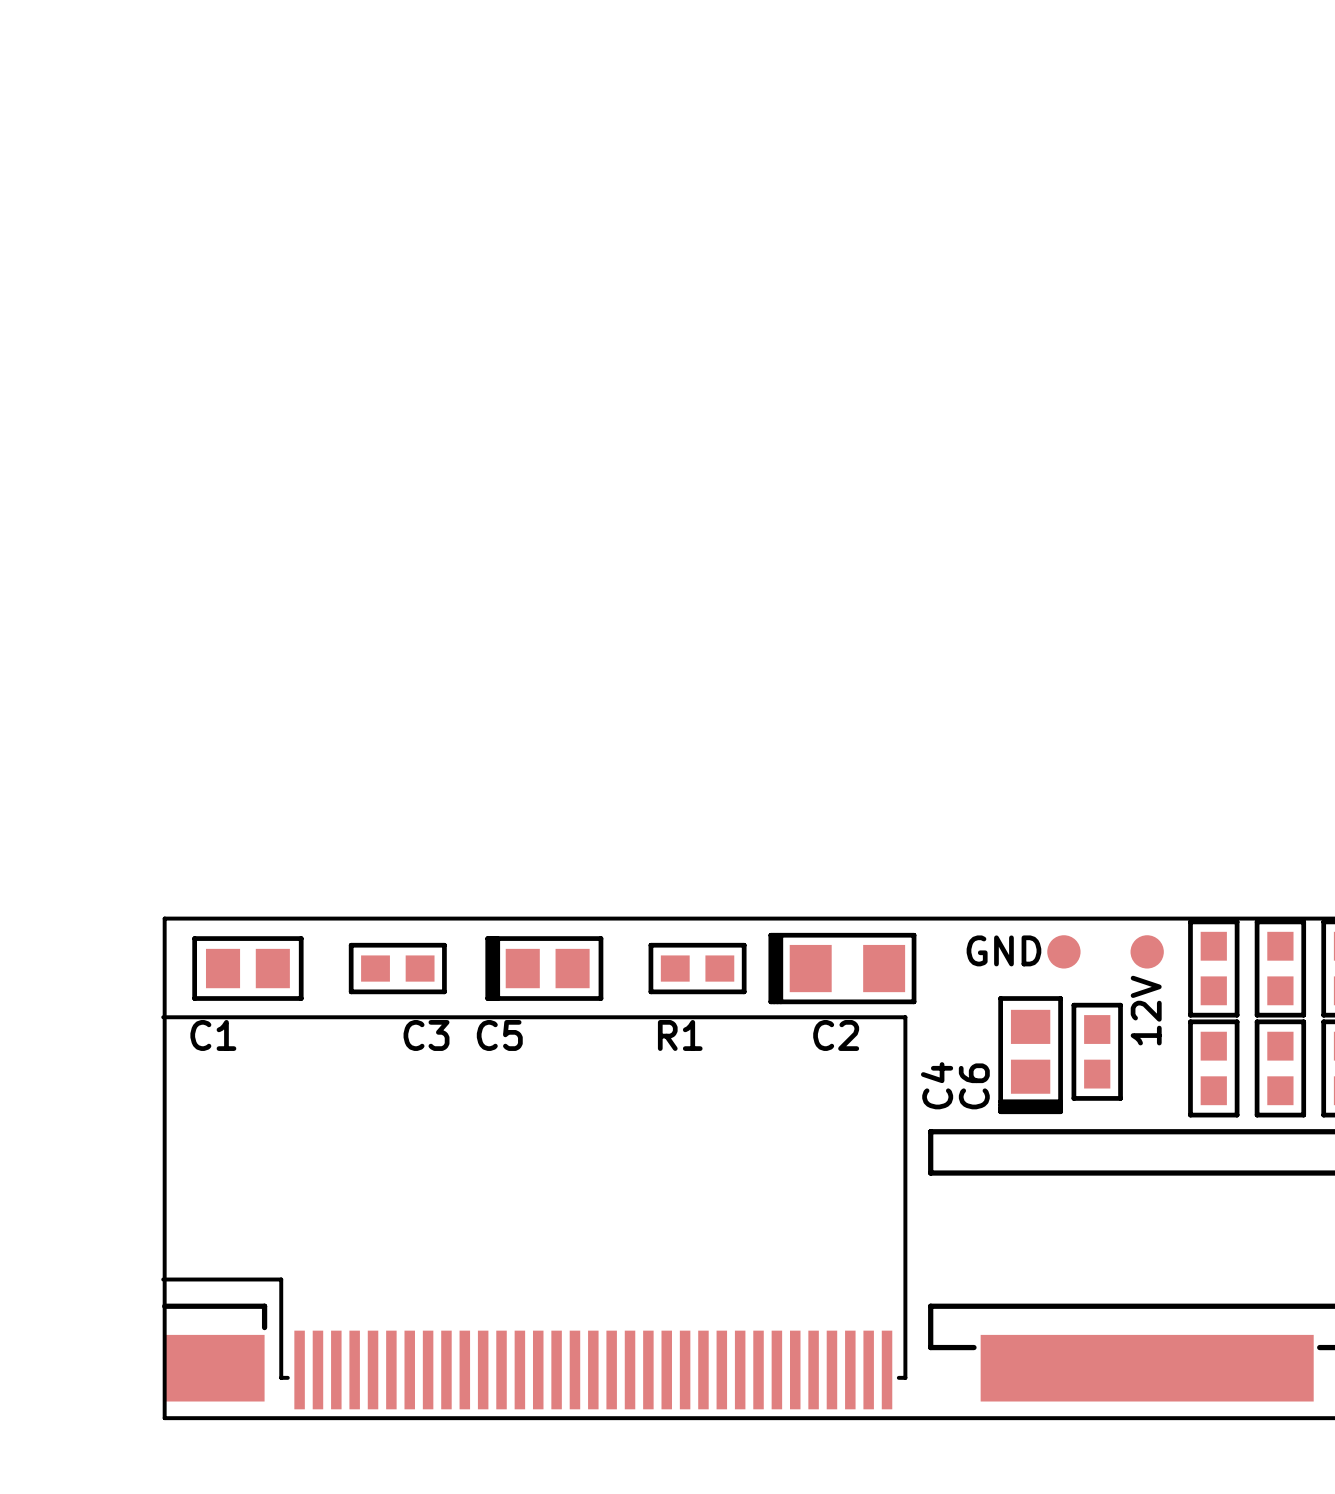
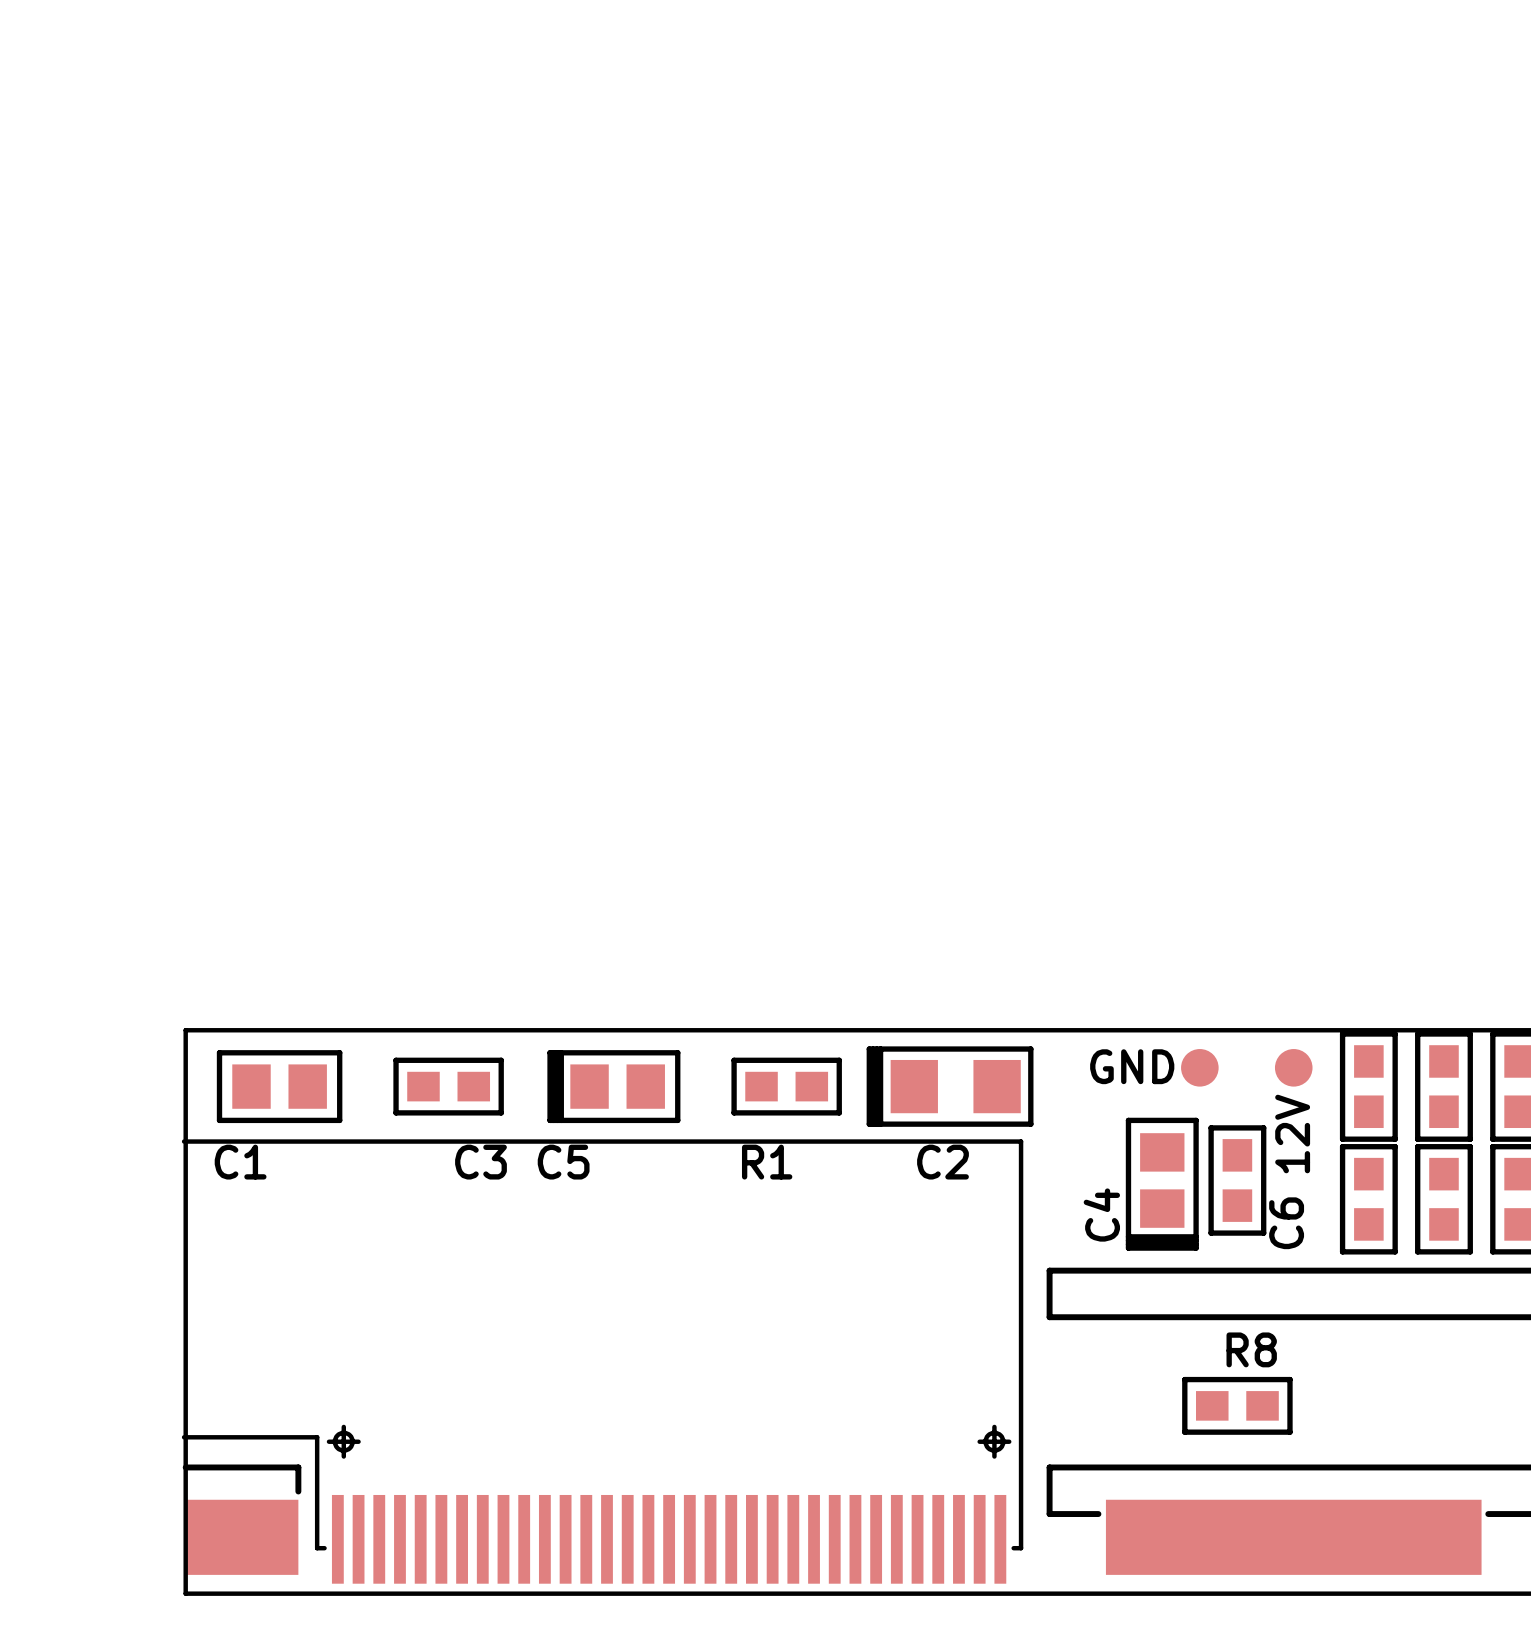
part footprint: [161, 1015, 908, 1410] -> [181, 1139, 1024, 1584]
C4 name position: C4 (937, 1085) -> C4 (1101, 1215)
C6 name position: C6 (974, 1086) -> C6 (1286, 1223)
R8: none -> (1237, 1405)

